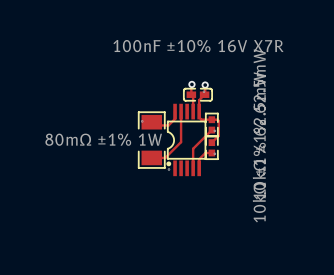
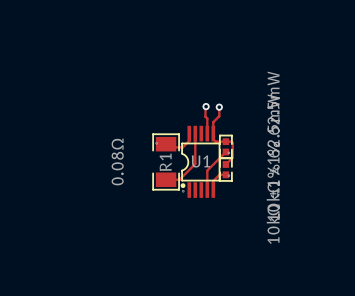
part: 100nF ±10% 16V X7R (197, 94) -> none
R1 value: 80mΩ ±1% 1W (103, 139) -> 0.08Ω (117, 162)
U1 name: none -> U1 (200, 161)
R1 name: none -> R1 (165, 162)

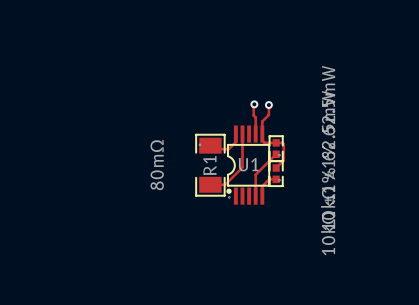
R1 value: 0.08Ω (117, 162) -> 80mΩ (157, 165)

